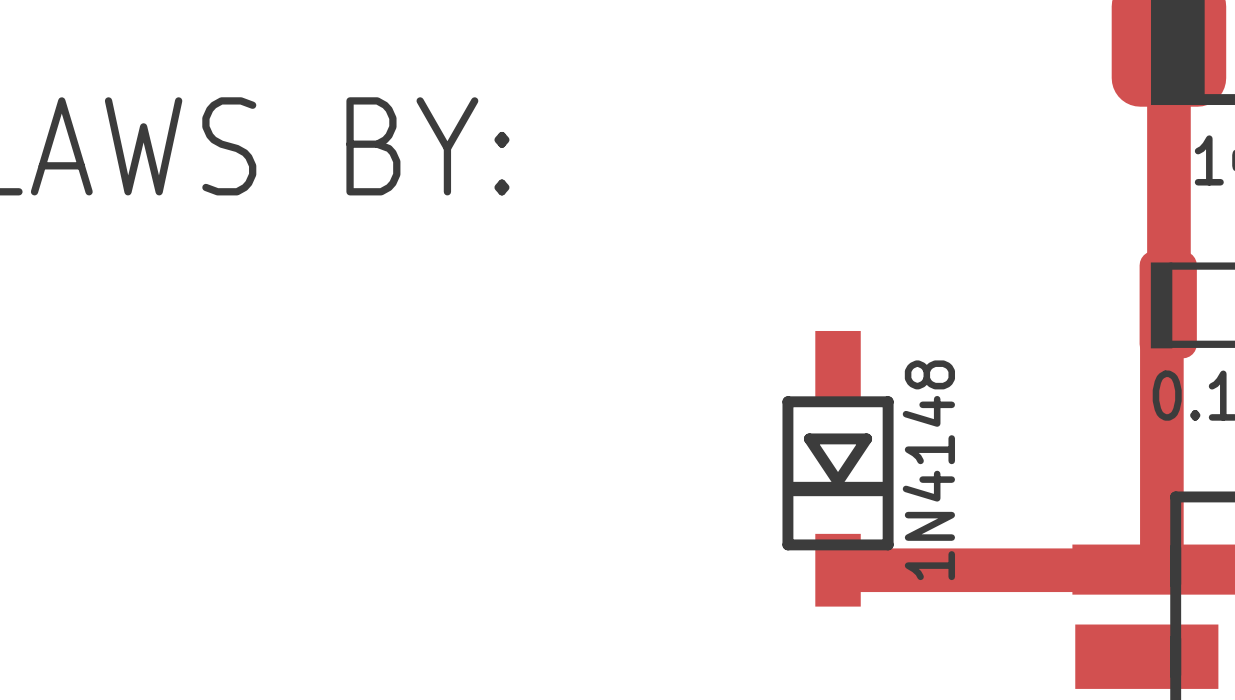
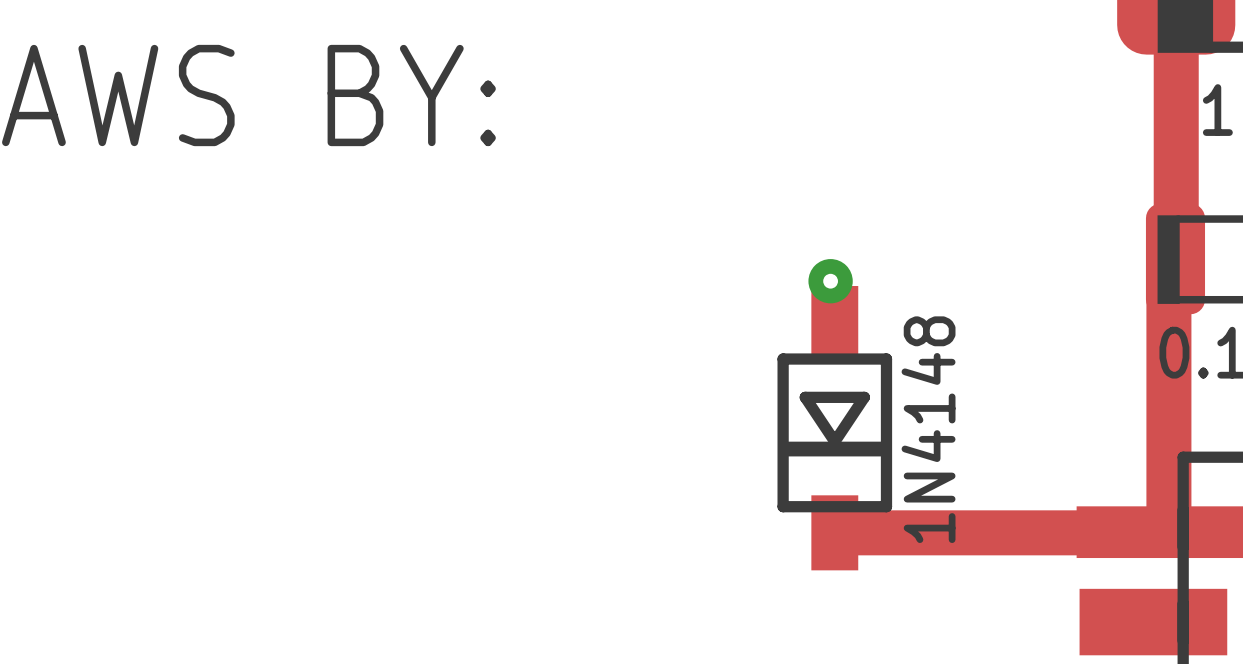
via: none -> (830, 281)

